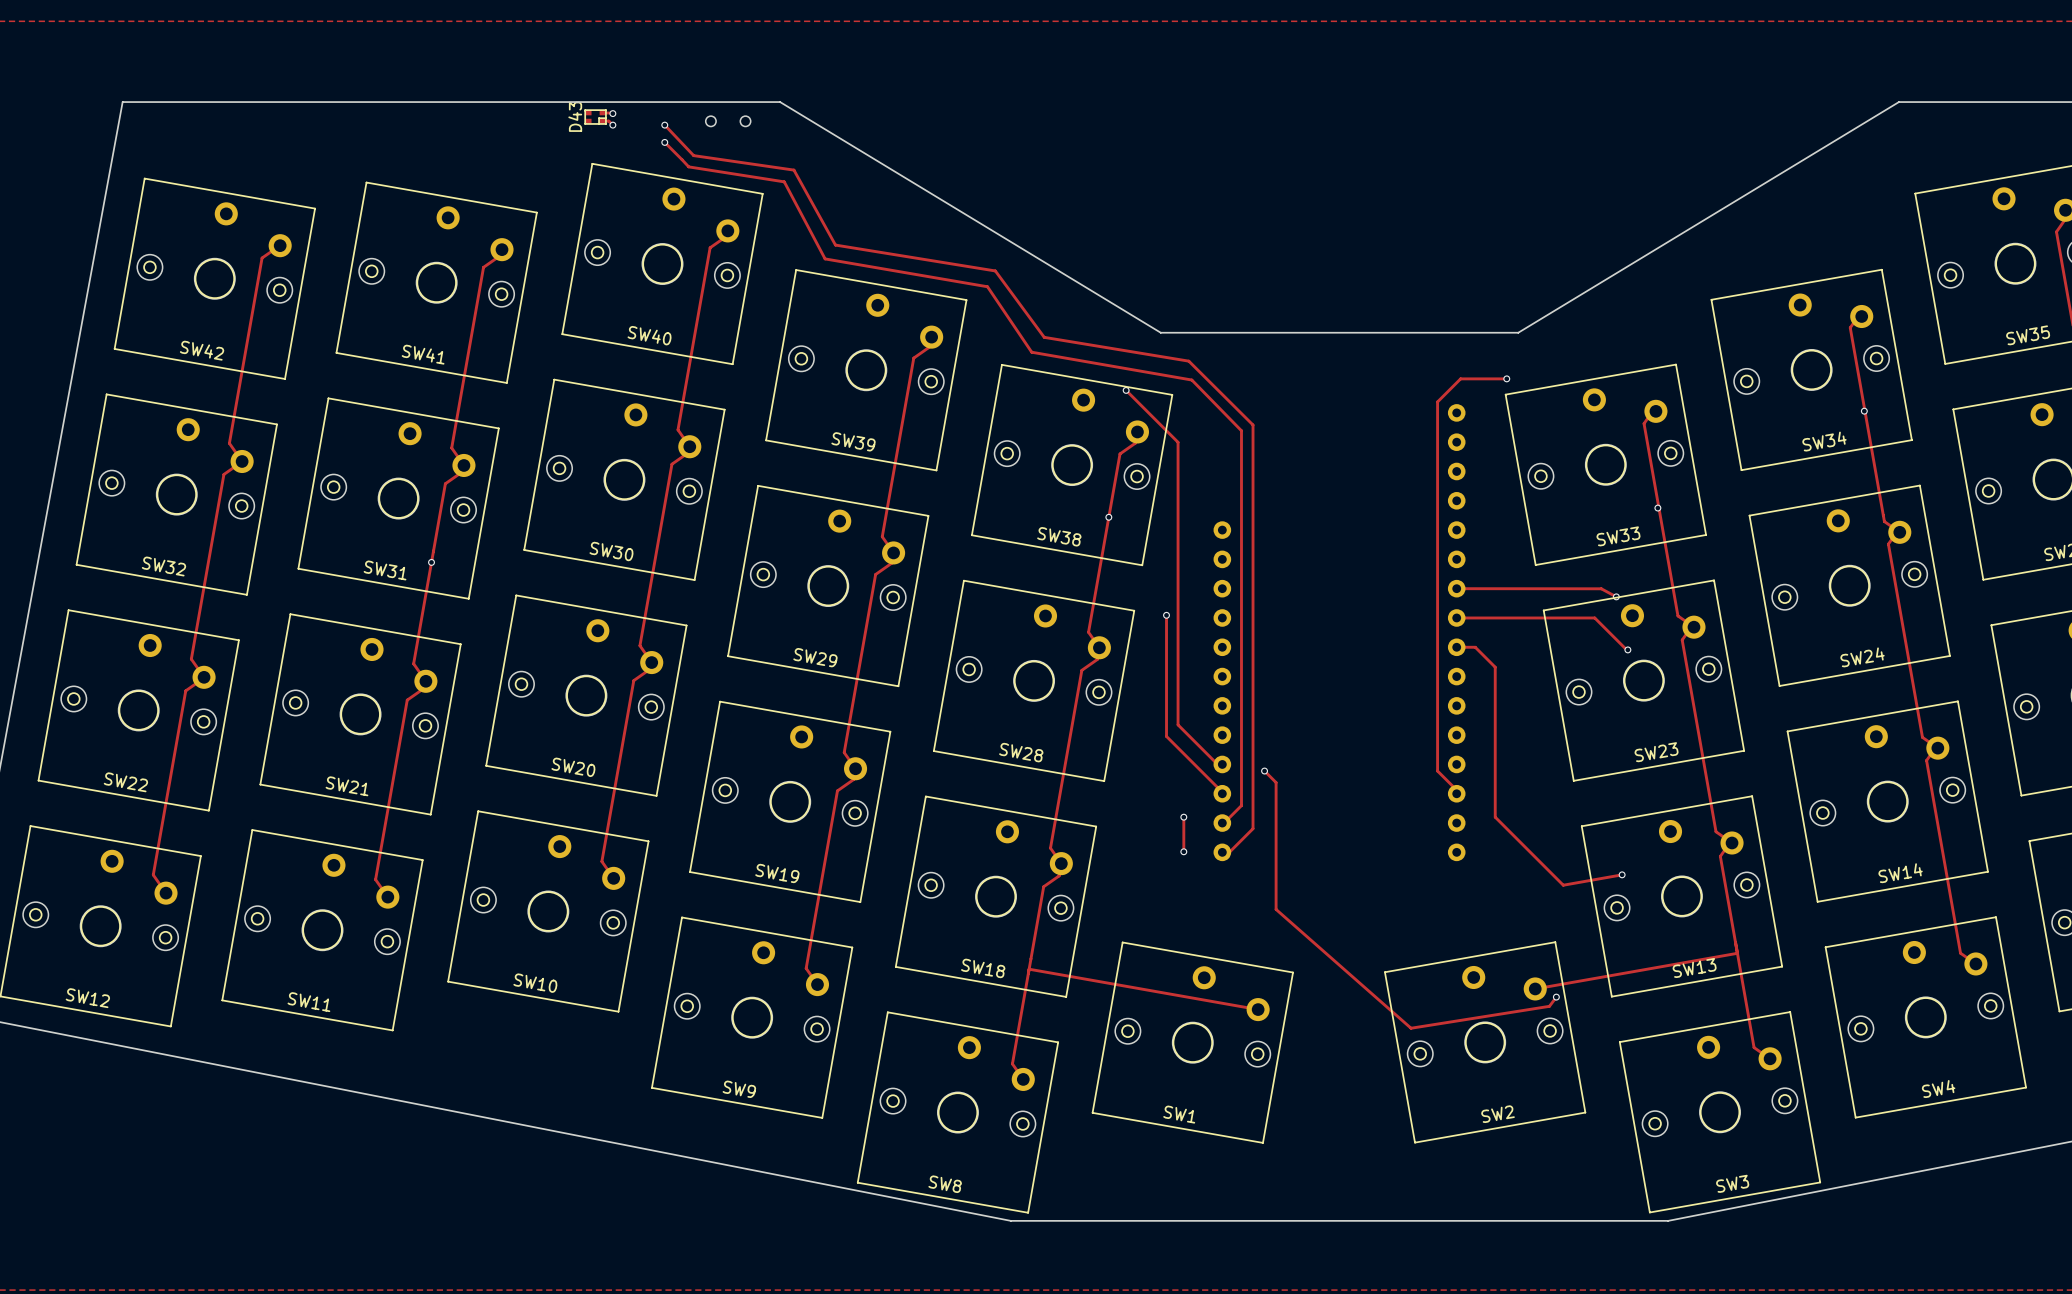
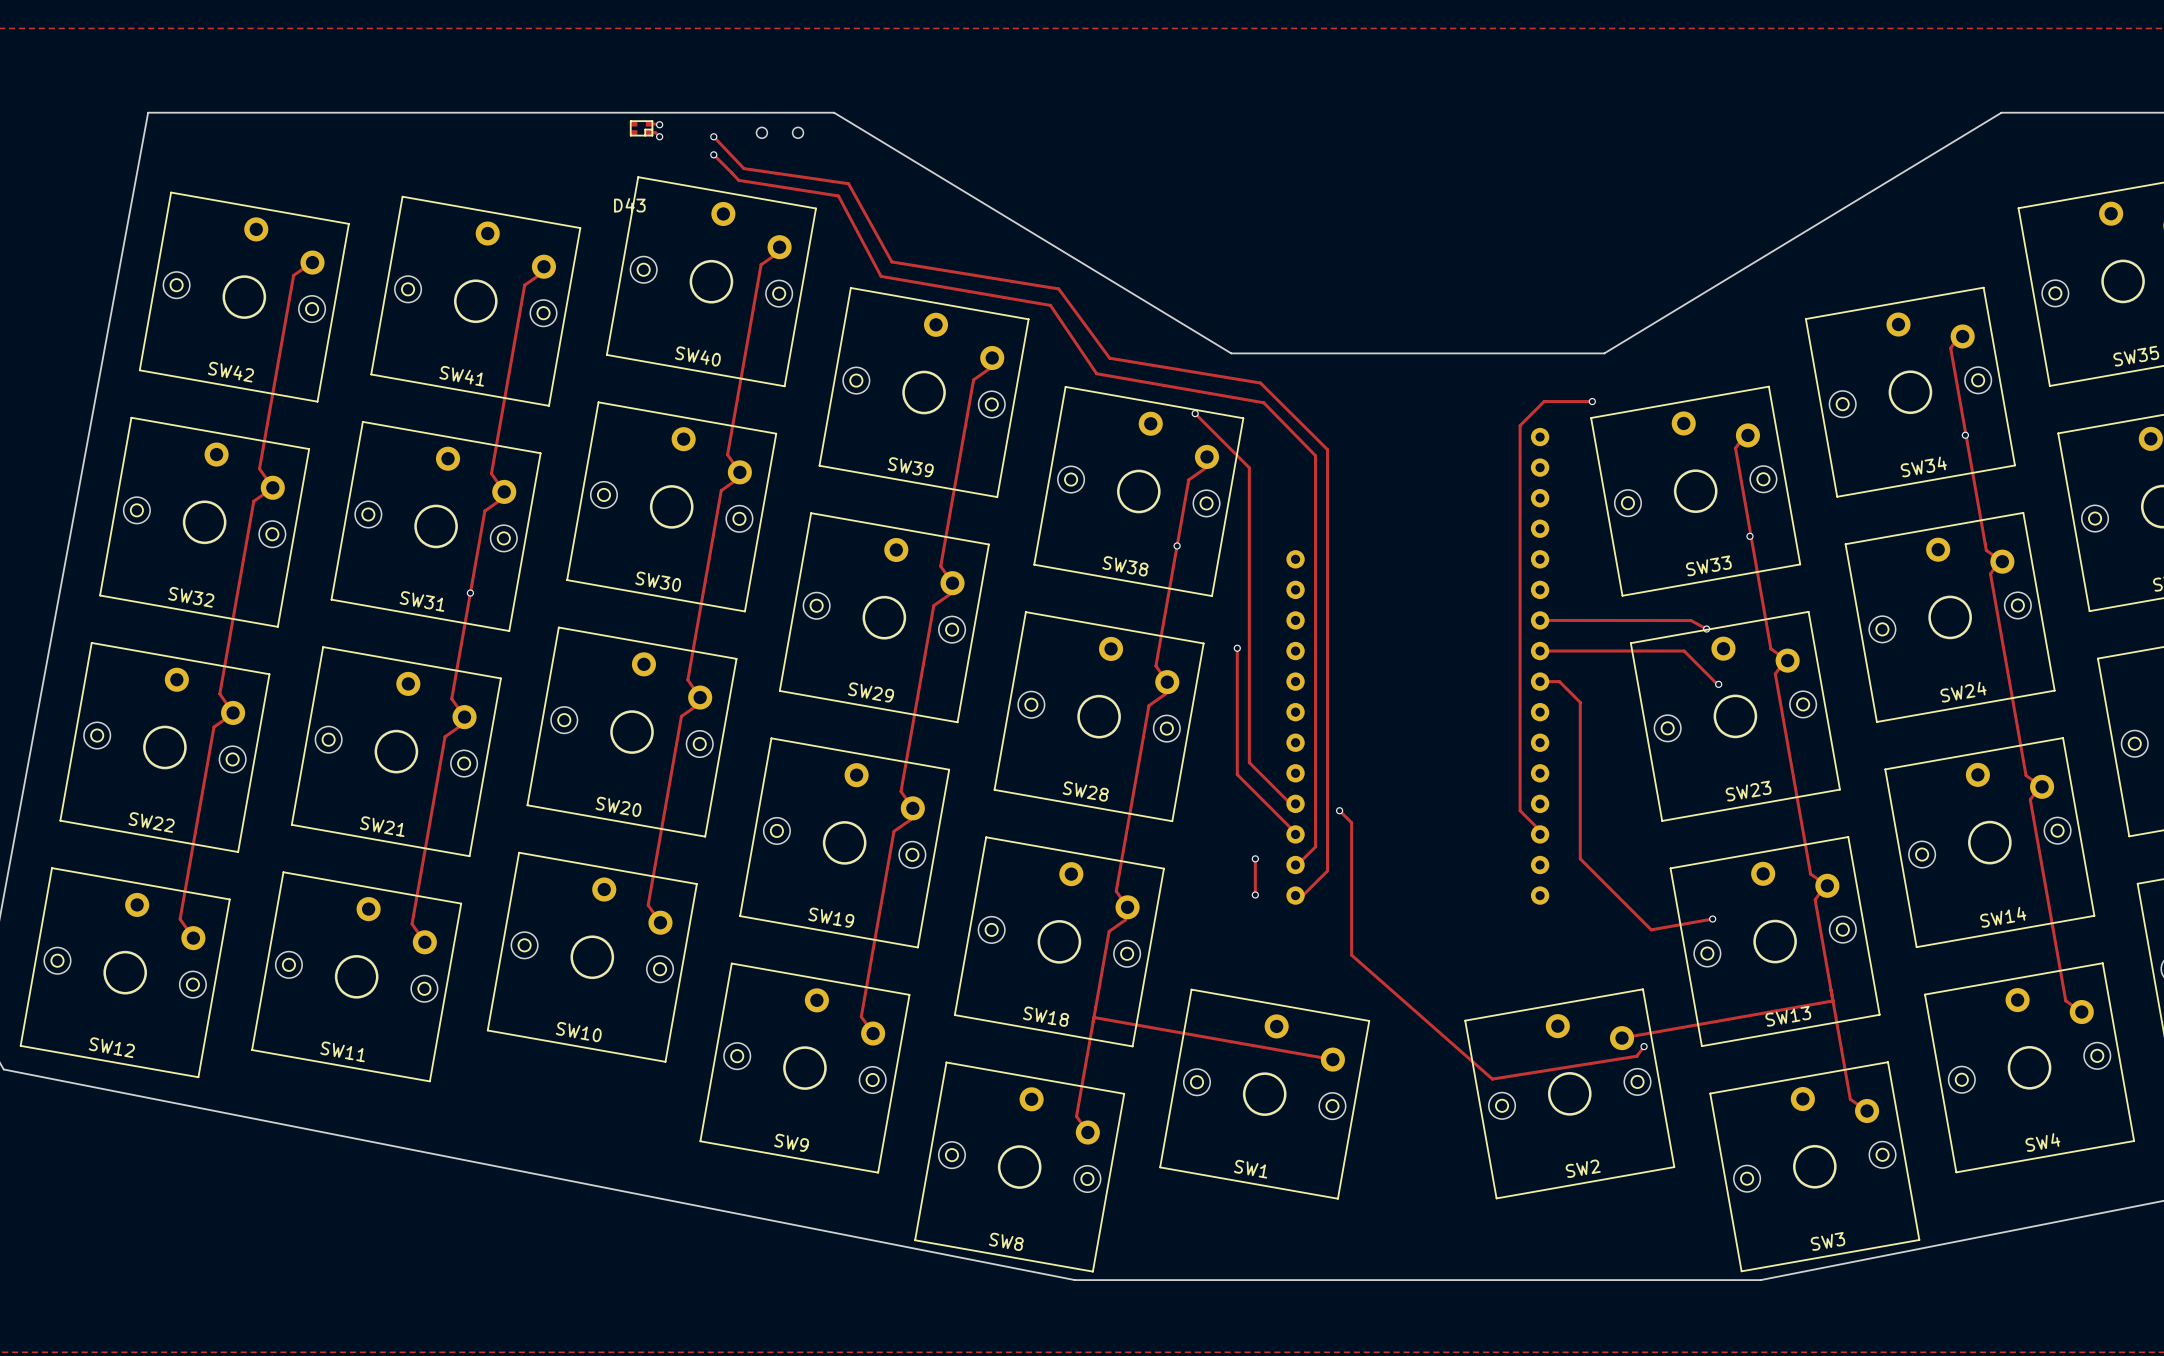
D43 name rotation: 0° (575, 116) -> 90° clockwise (629, 205)
D43 name position: D43 (575, 116) -> D43 (629, 205)

